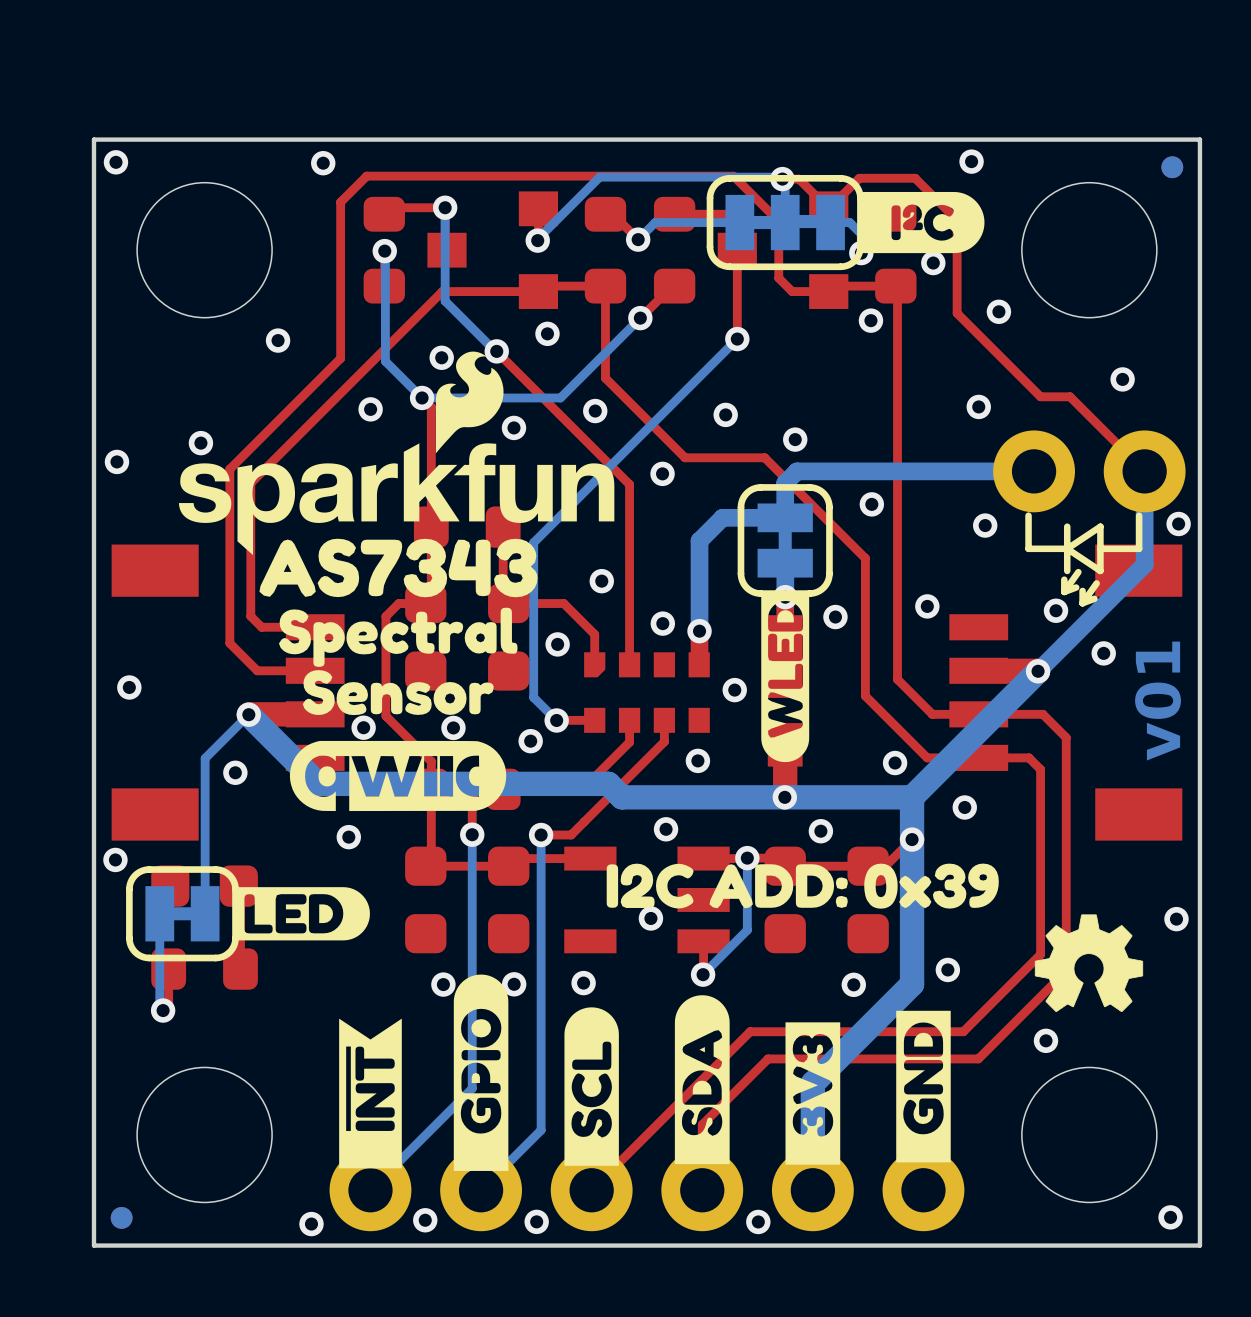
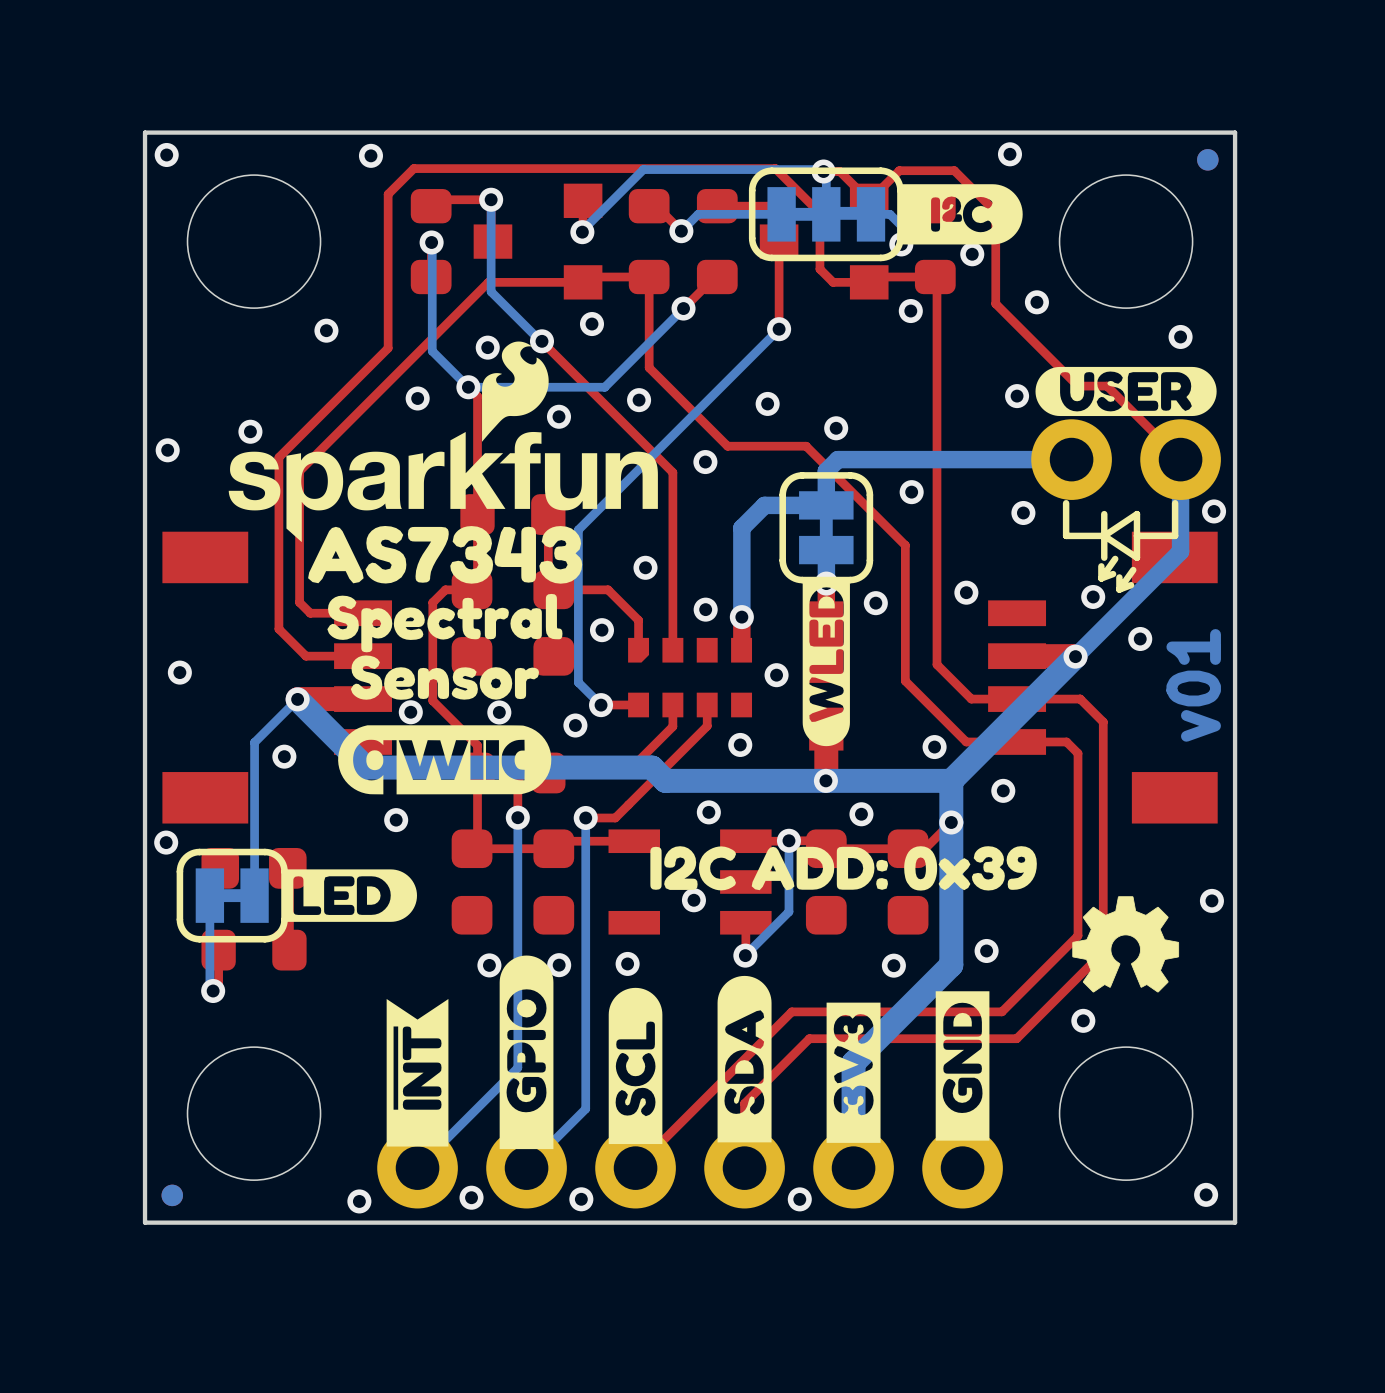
drawing: none -> [1035, 366, 1217, 417]
via position: (1122, 379) -> (1180, 336)

